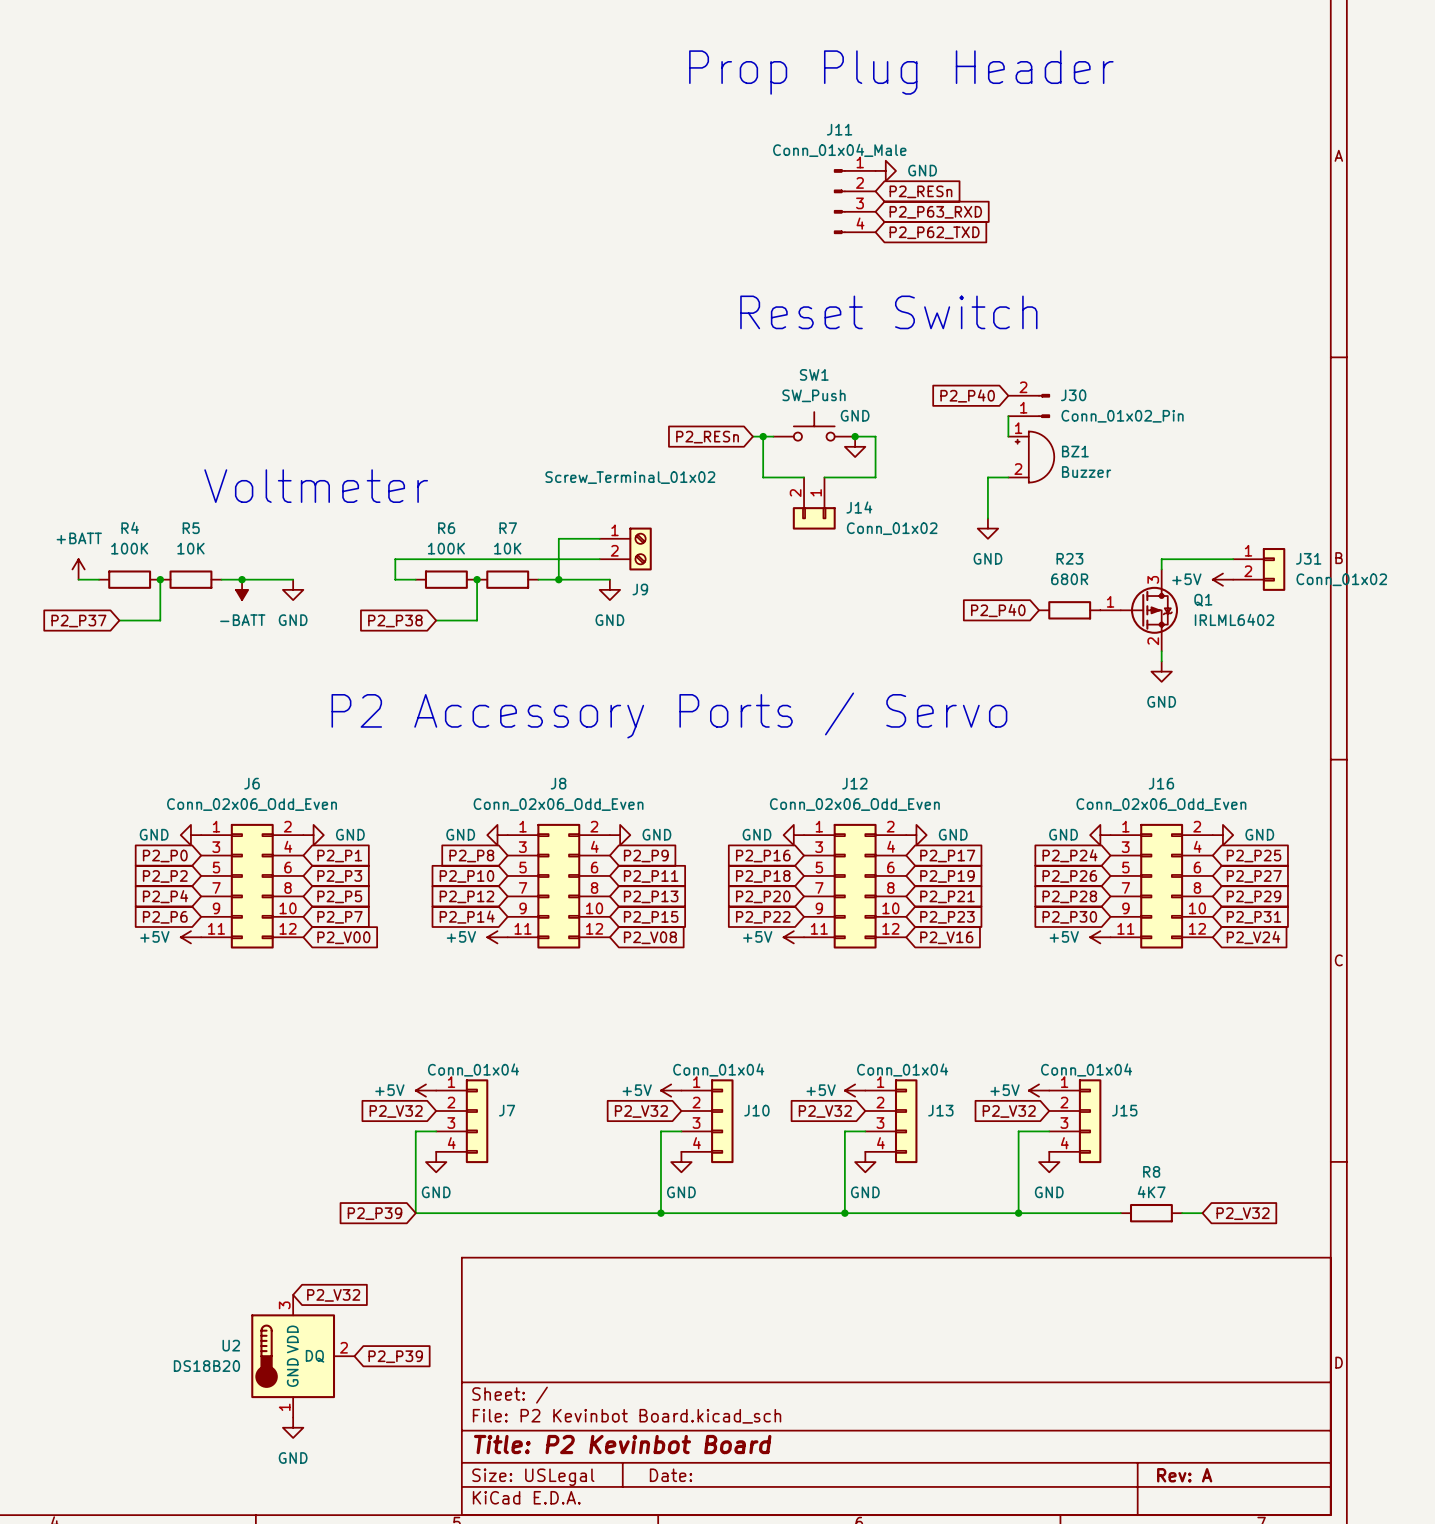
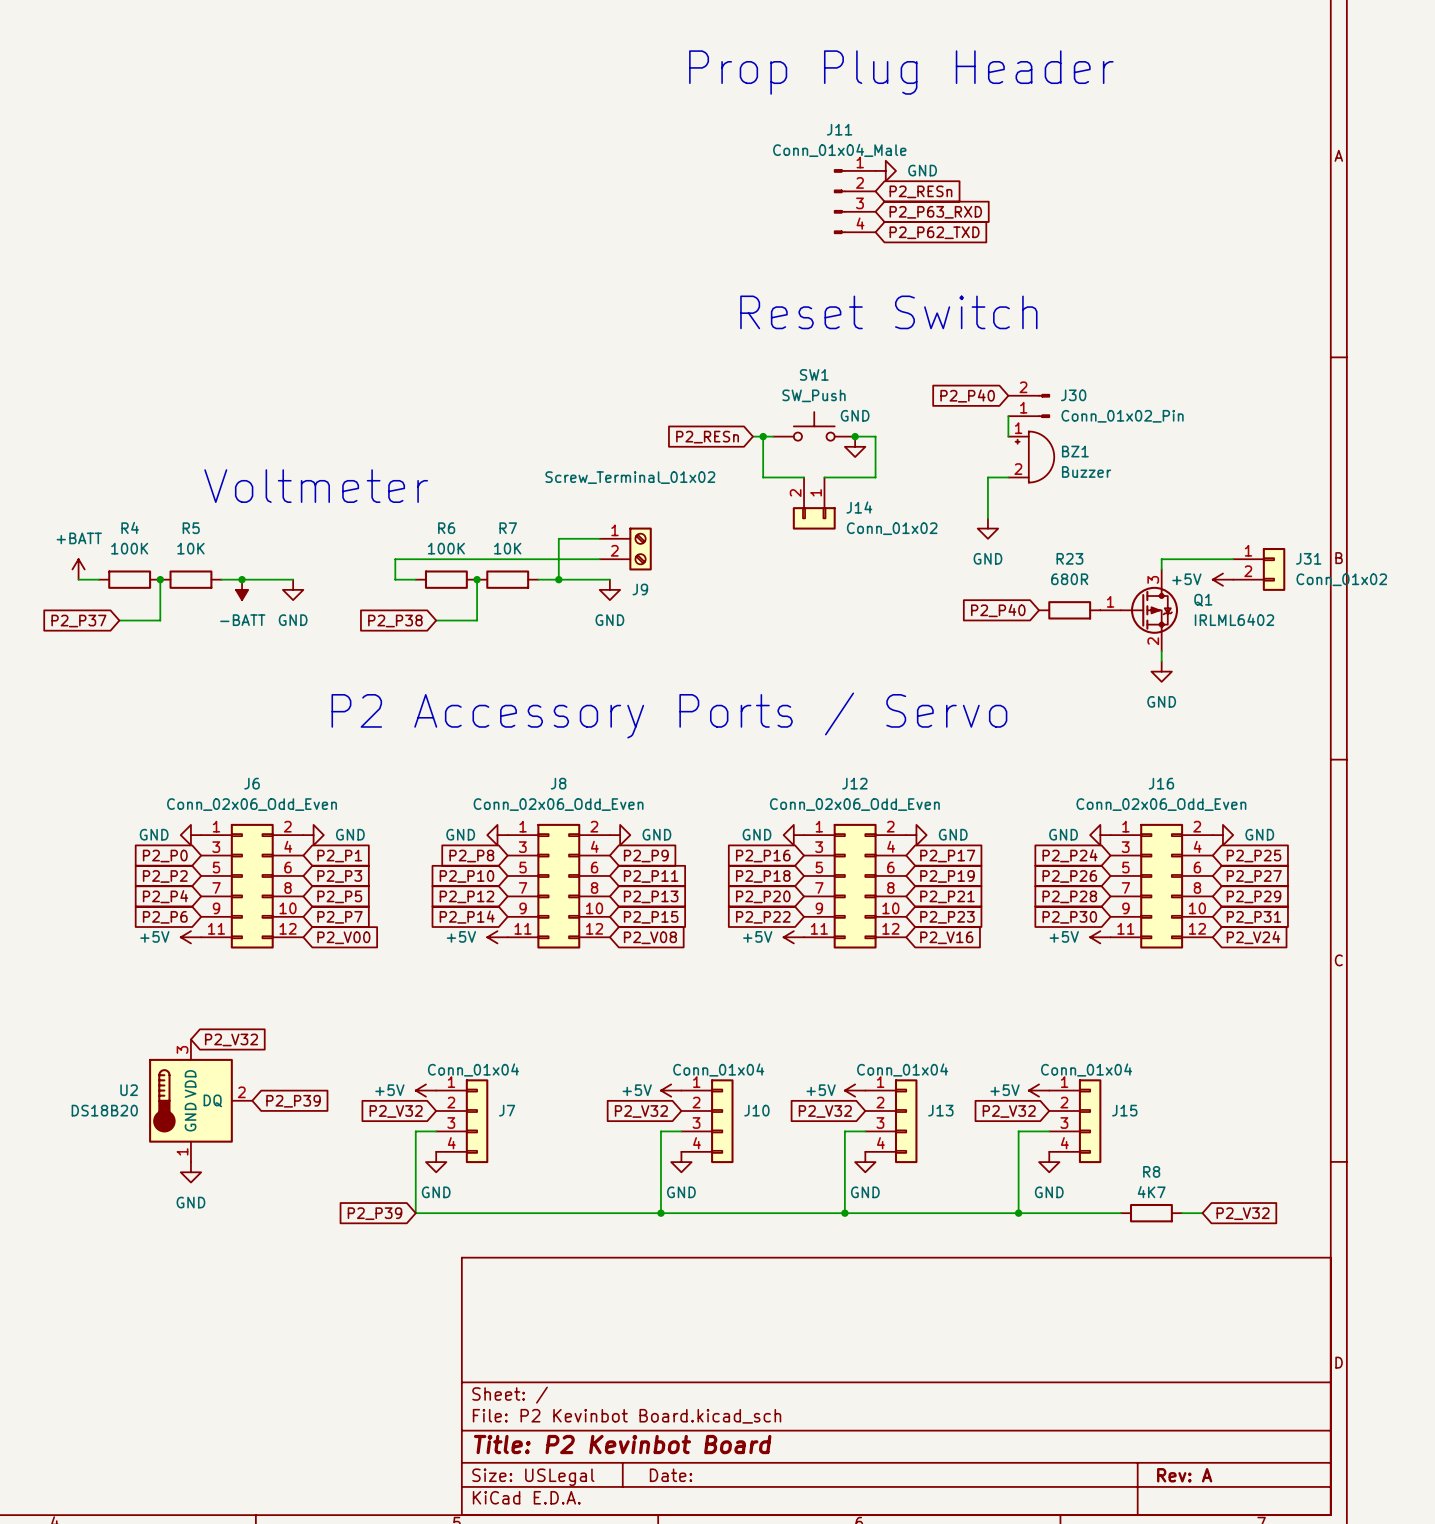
global label: none -> P2_V32 (231, 1039)
global label: none -> P2_P39 (293, 1101)
power symbol: none -> GND (190, 1172)
global label: P2_V32 (333, 1295) -> none
U2 position: (302, 1356) -> (200, 1100)
global label: P2_P39 (395, 1356) -> none
power symbol: GND (293, 1427) -> none

